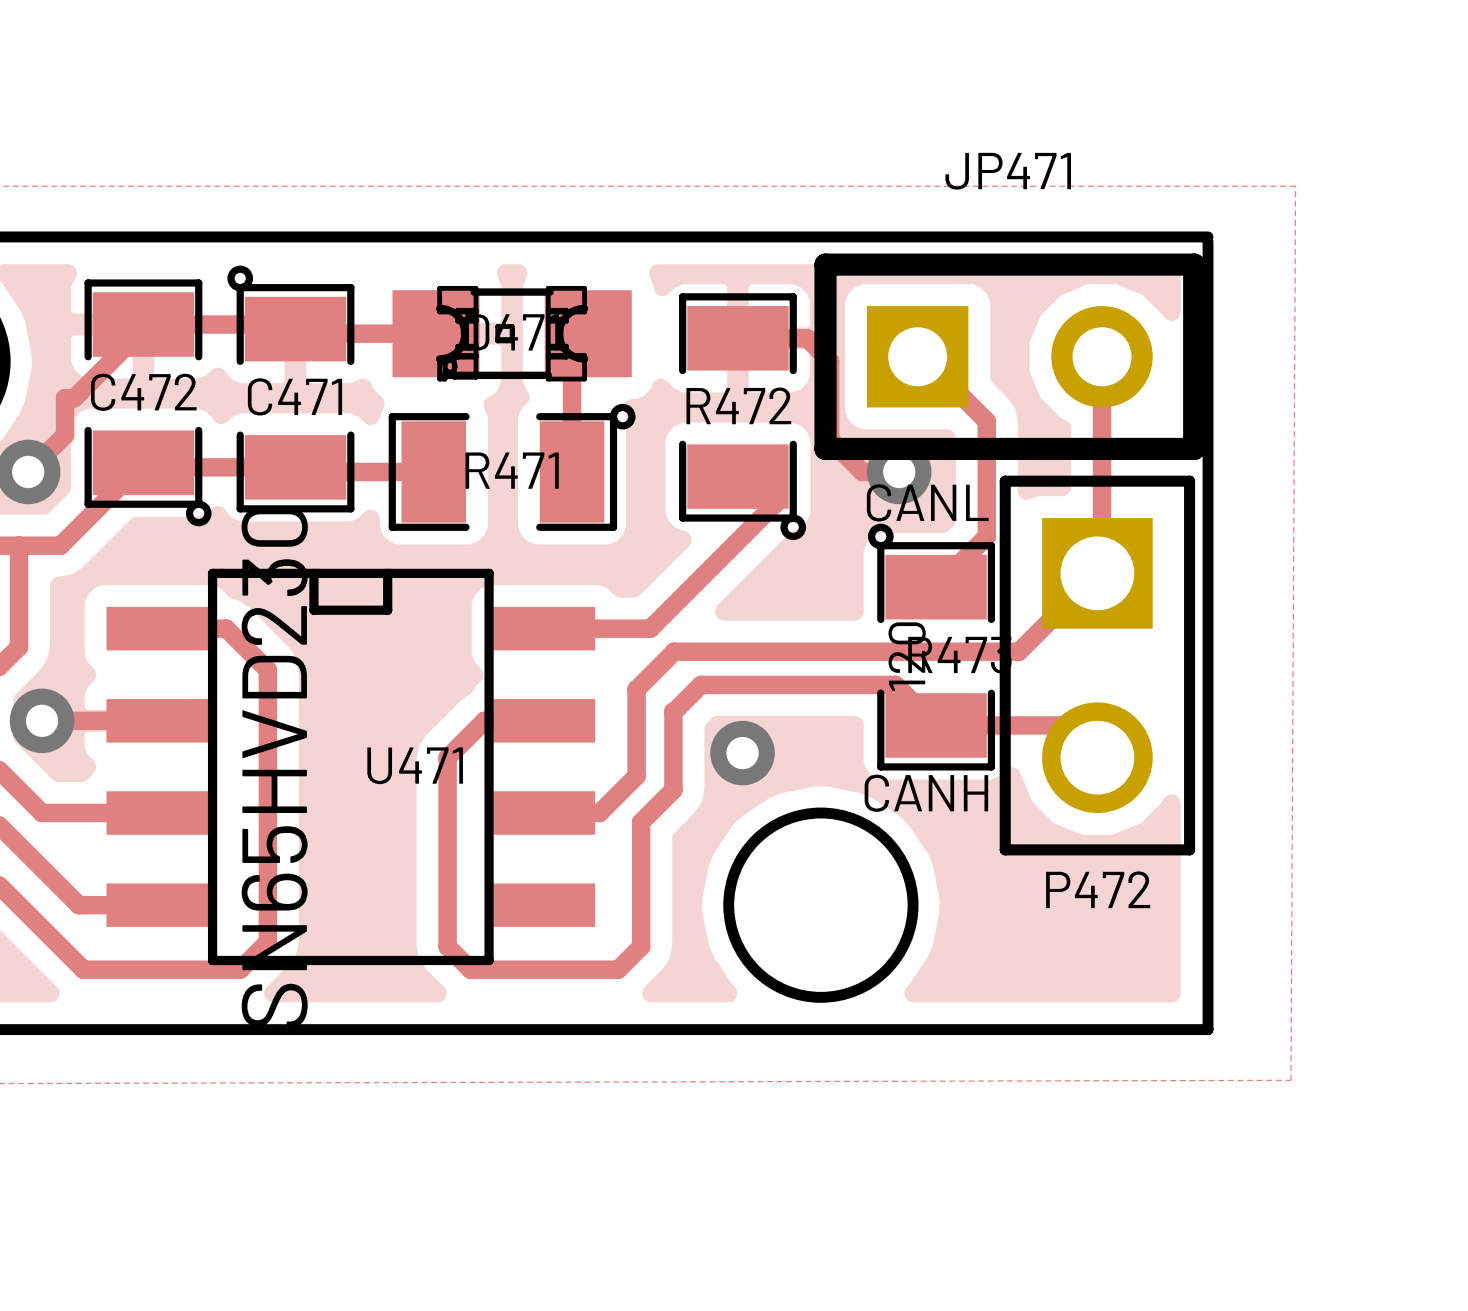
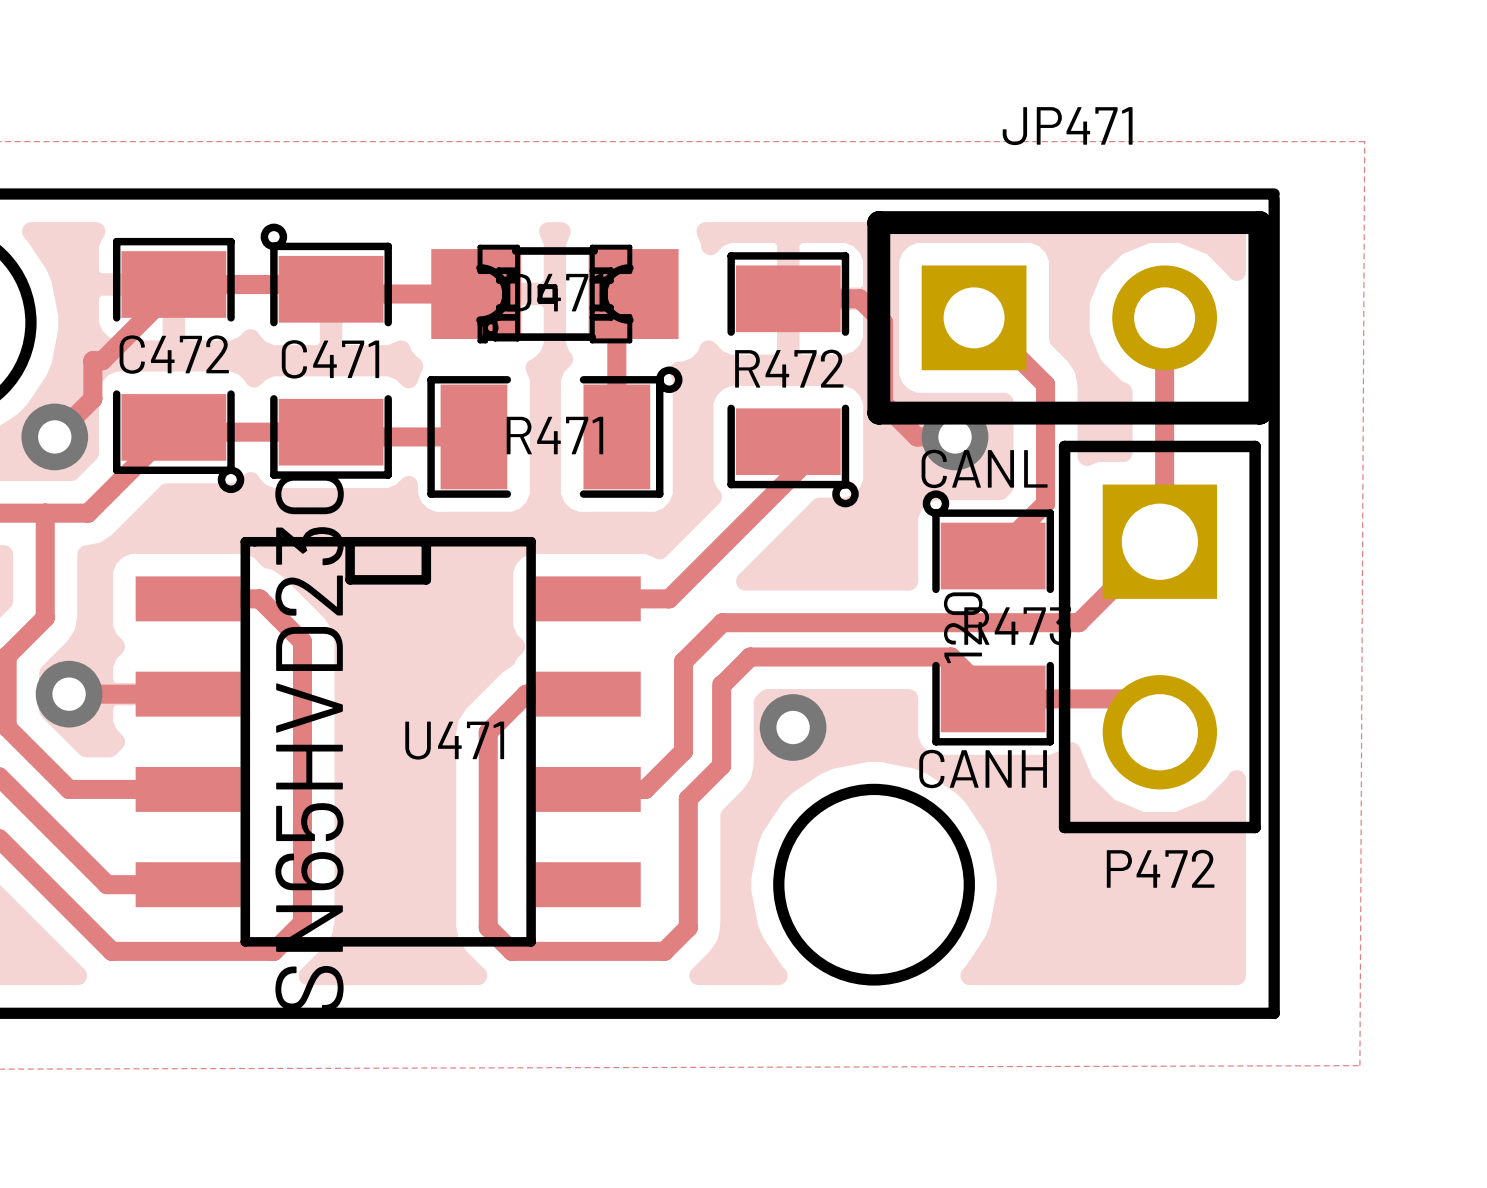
track: (774, 476) (774, 504) (650, 628) (622, 628) -> (826, 441) (669, 598)

